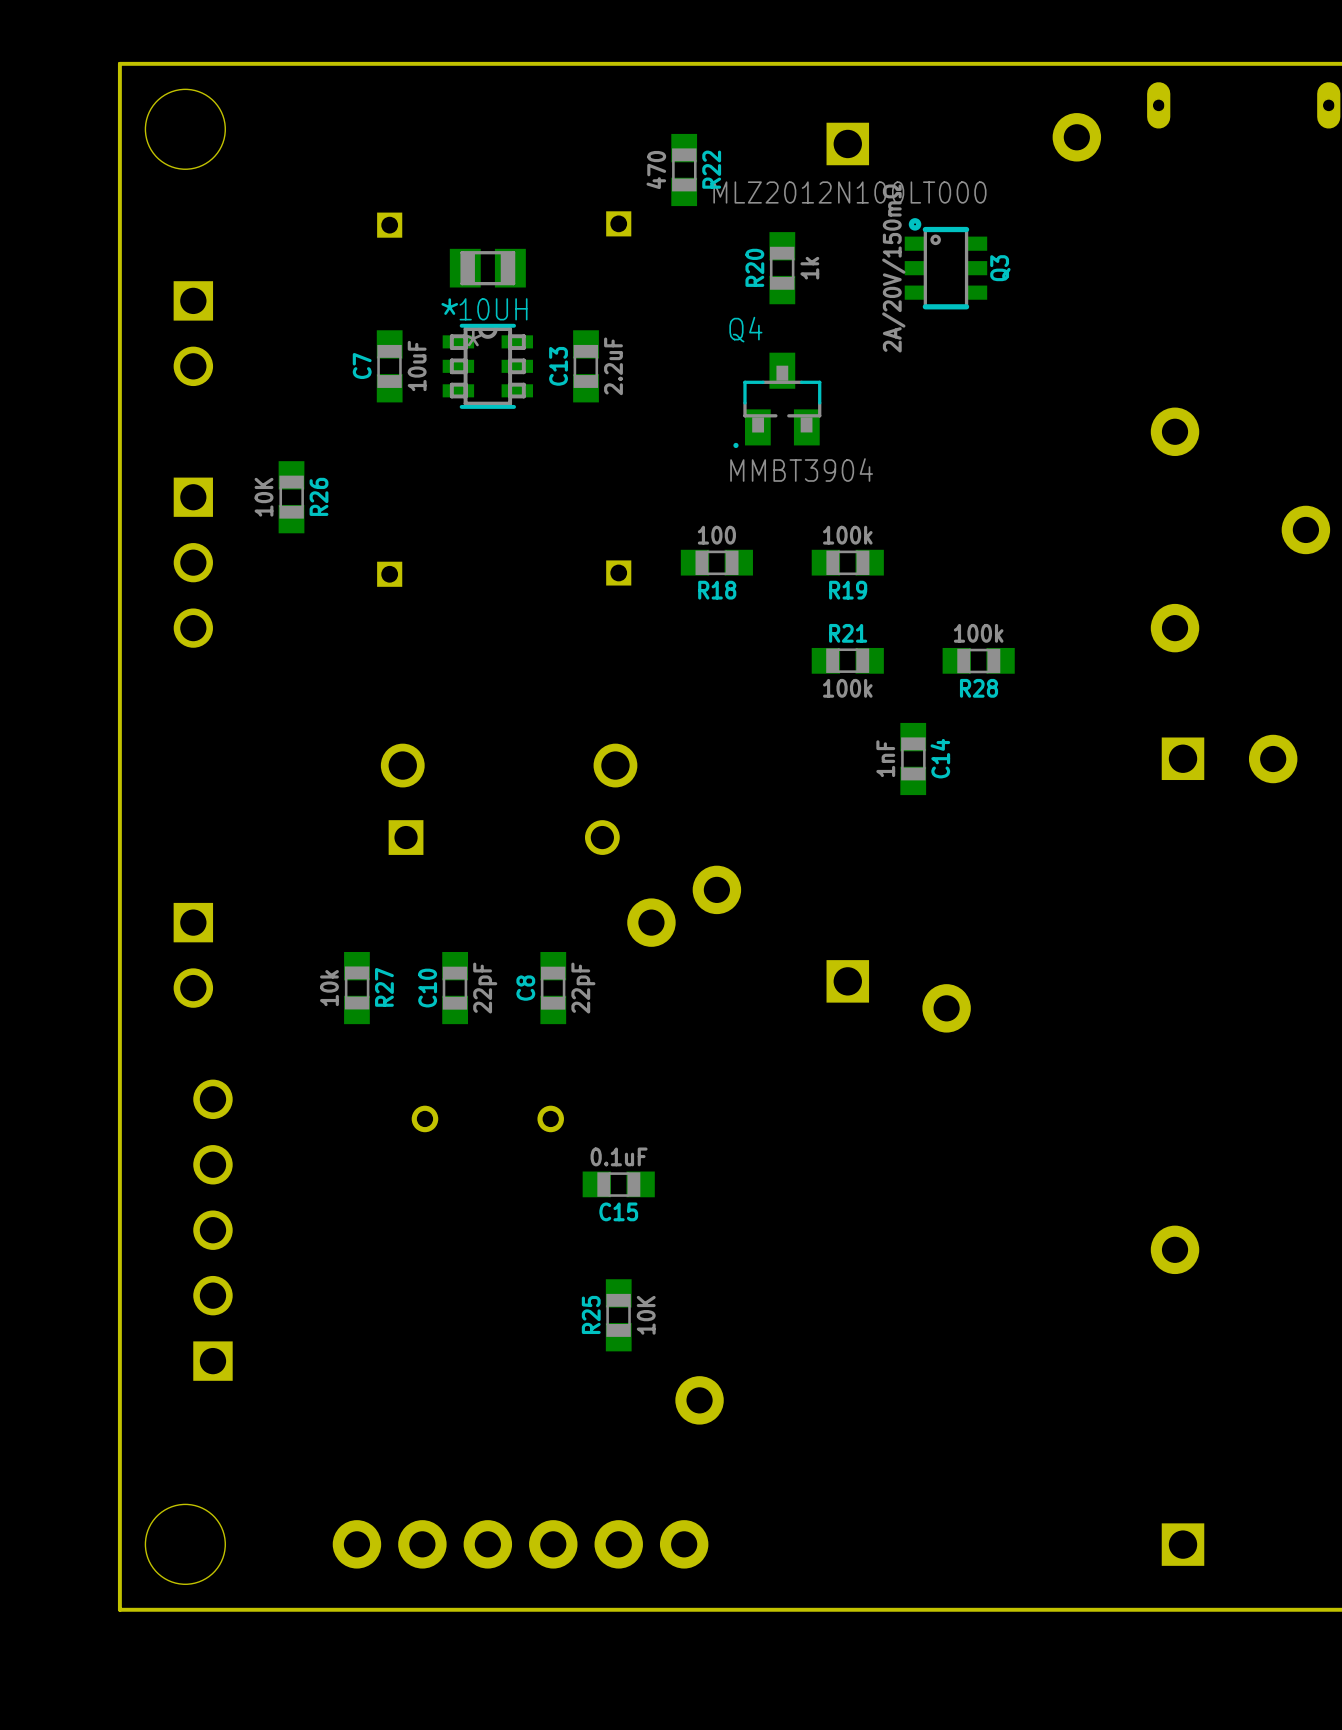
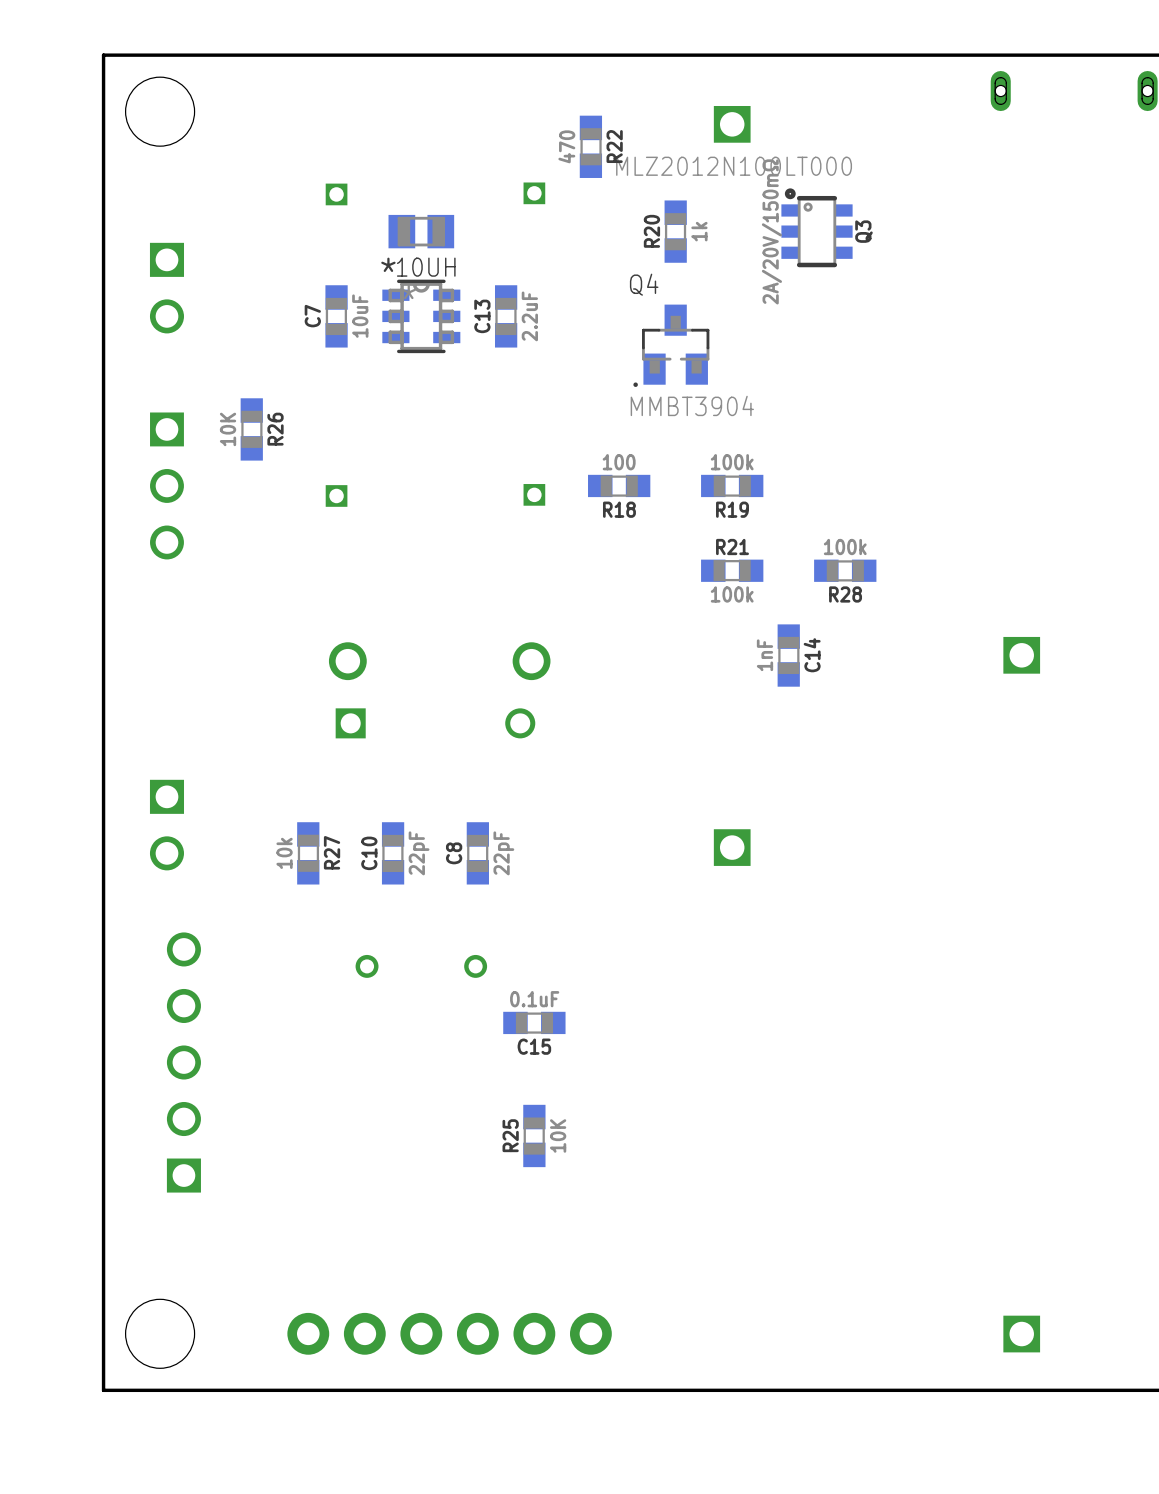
part: (1076, 137) -> none
part: (1175, 431) -> none
part: (1305, 529) -> none
part: (1175, 628) -> none
part: (1273, 759) -> none
part: (716, 889) -> none
part: (651, 922) -> none
part: (946, 1008) -> none
part: (1175, 1249) -> none
part: (699, 1400) -> none

